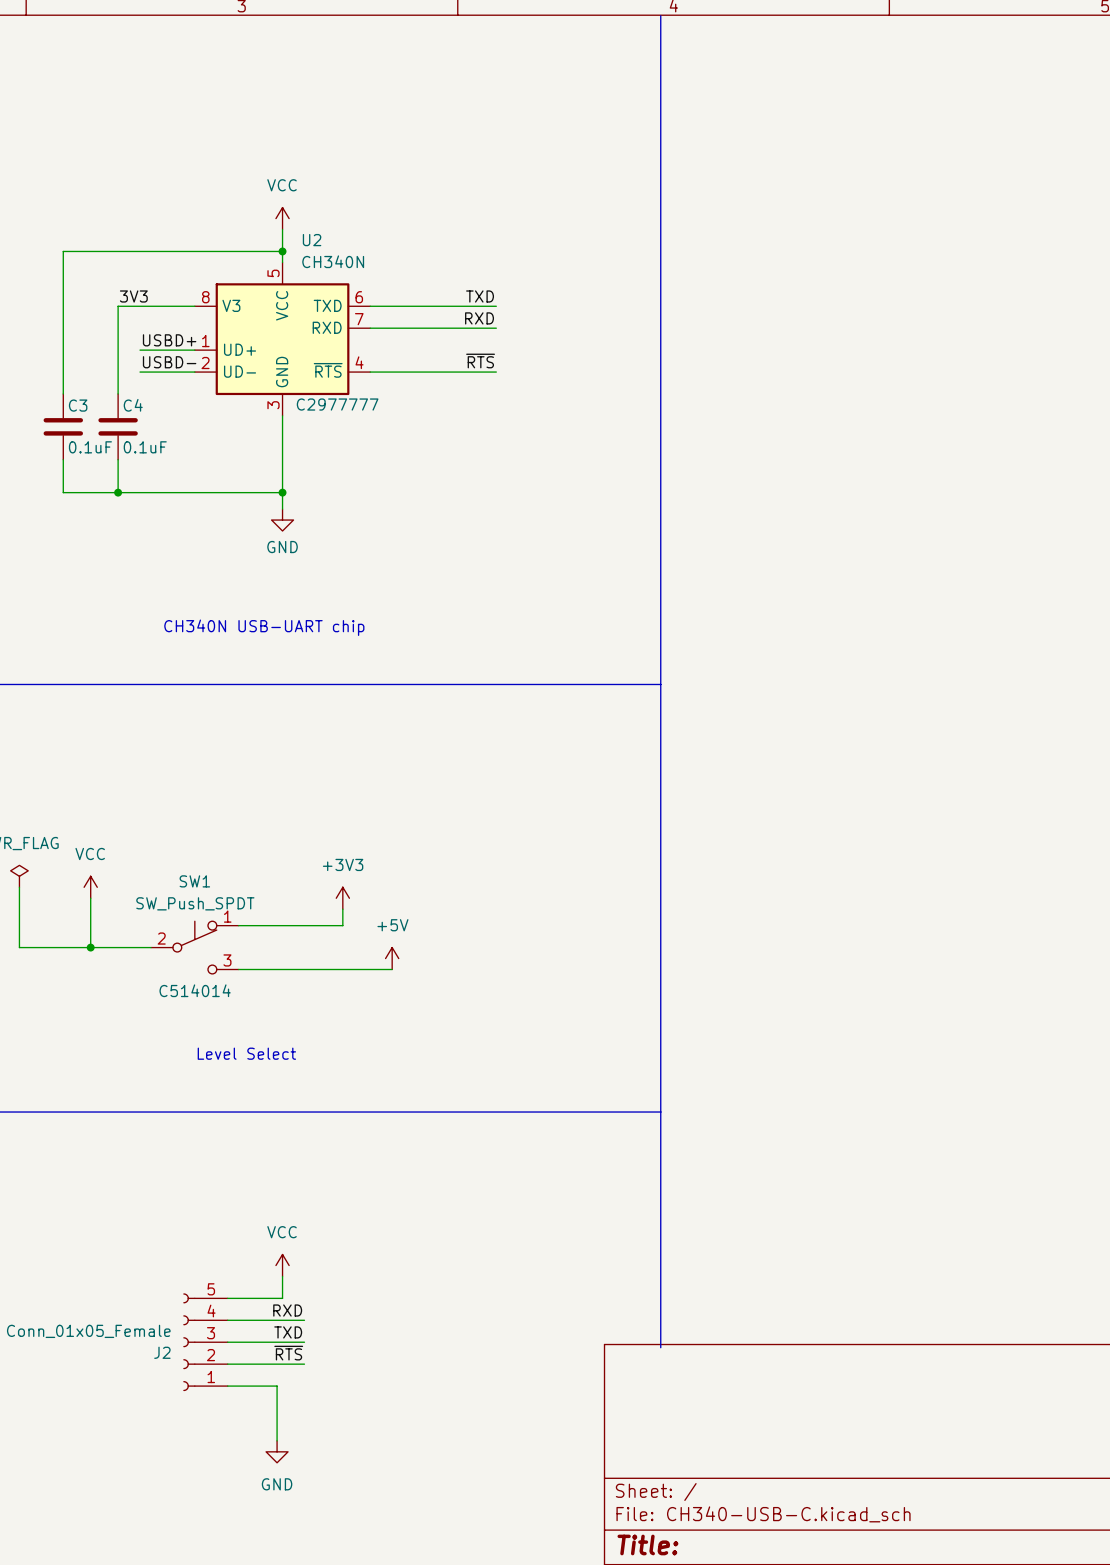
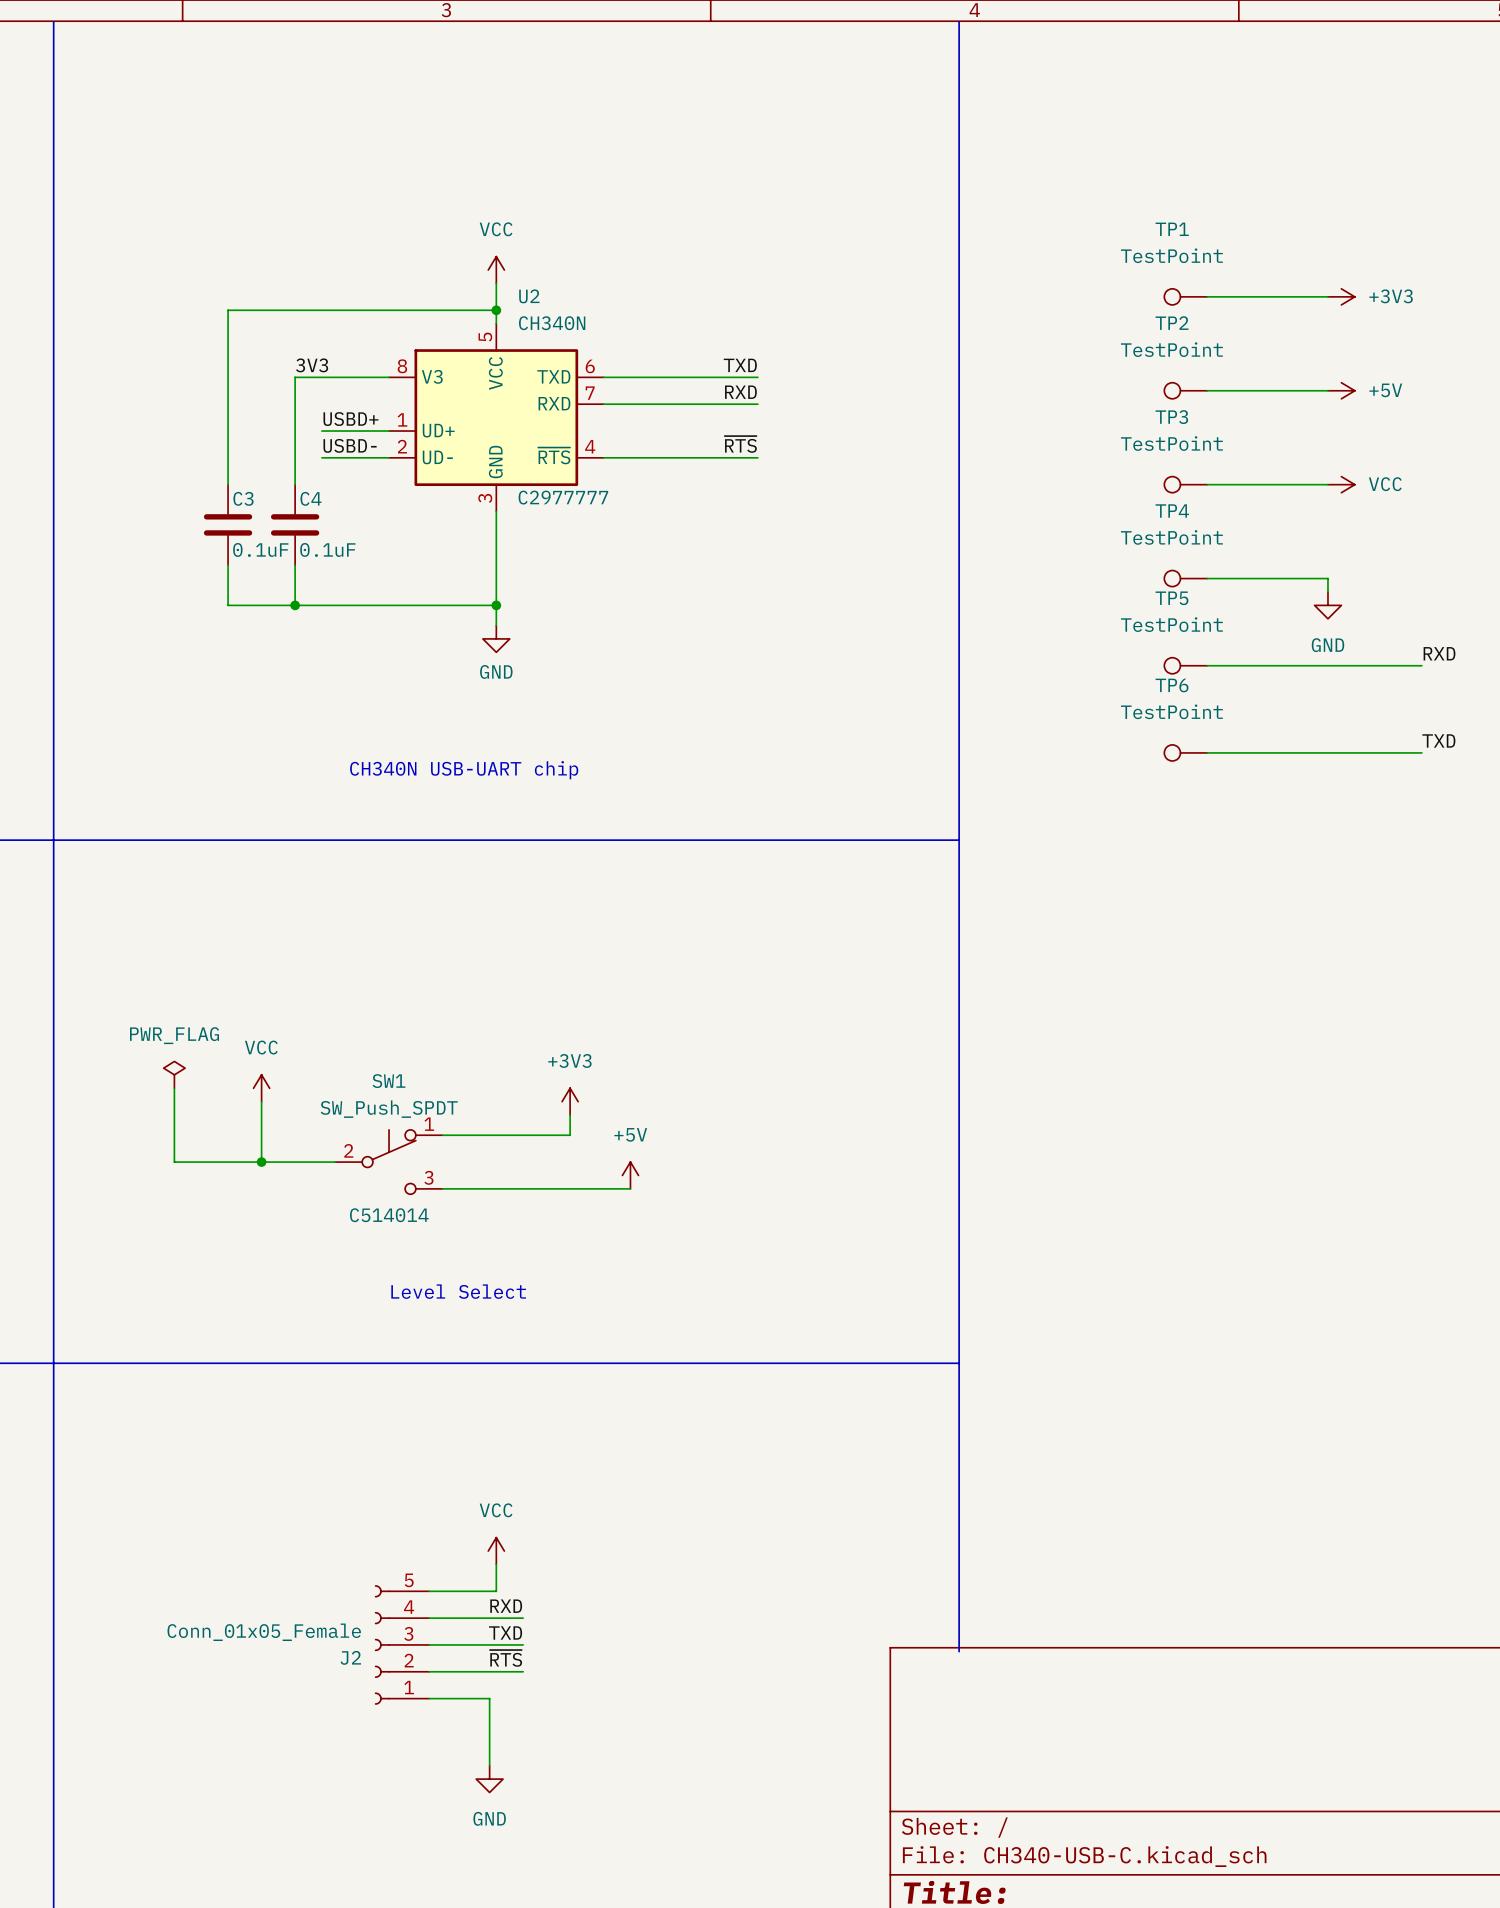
TP1: none -> TestPoint (1185, 296)
wire: none -> (1207, 296) (1327, 296)
power symbol: none -> +3V3 (1341, 296)
TP2: none -> TestPoint (1185, 390)
wire: none -> (1207, 390) (1327, 390)
power symbol: none -> +5V (1341, 390)
TP3: none -> TestPoint (1185, 484)
wire: none -> (1207, 484) (1327, 484)
power symbol: none -> VCC (1341, 484)
TP4: none -> TestPoint (1185, 578)
wire: none -> (1207, 578) (1327, 578) (1327, 591)
power symbol: none -> GND (1327, 605)
label: none -> RXD (1439, 653)
TP5: none -> TestPoint (1185, 665)
wire: none -> (1207, 665) (1421, 665)
label: none -> TXD (1438, 740)
TP6: none -> TestPoint (1185, 752)
wire: none -> (1207, 752) (1421, 752)

